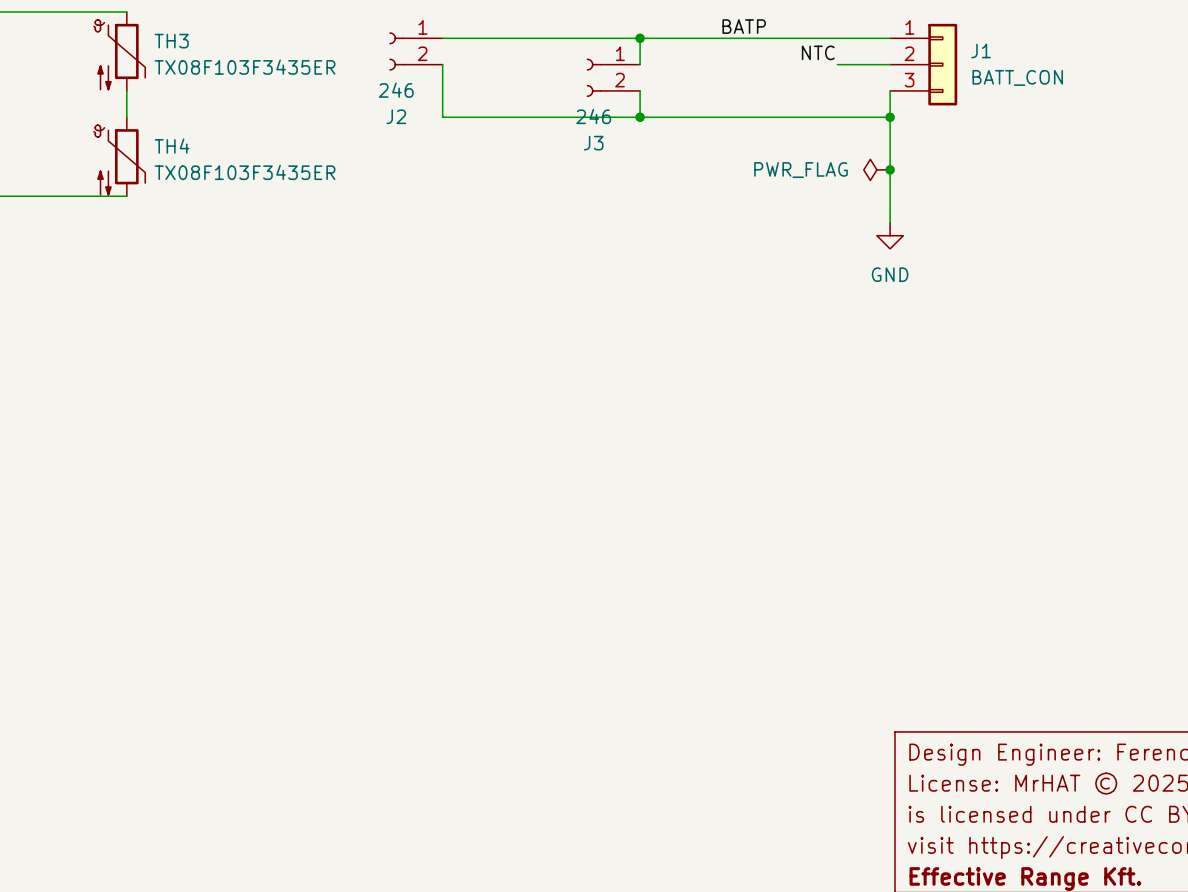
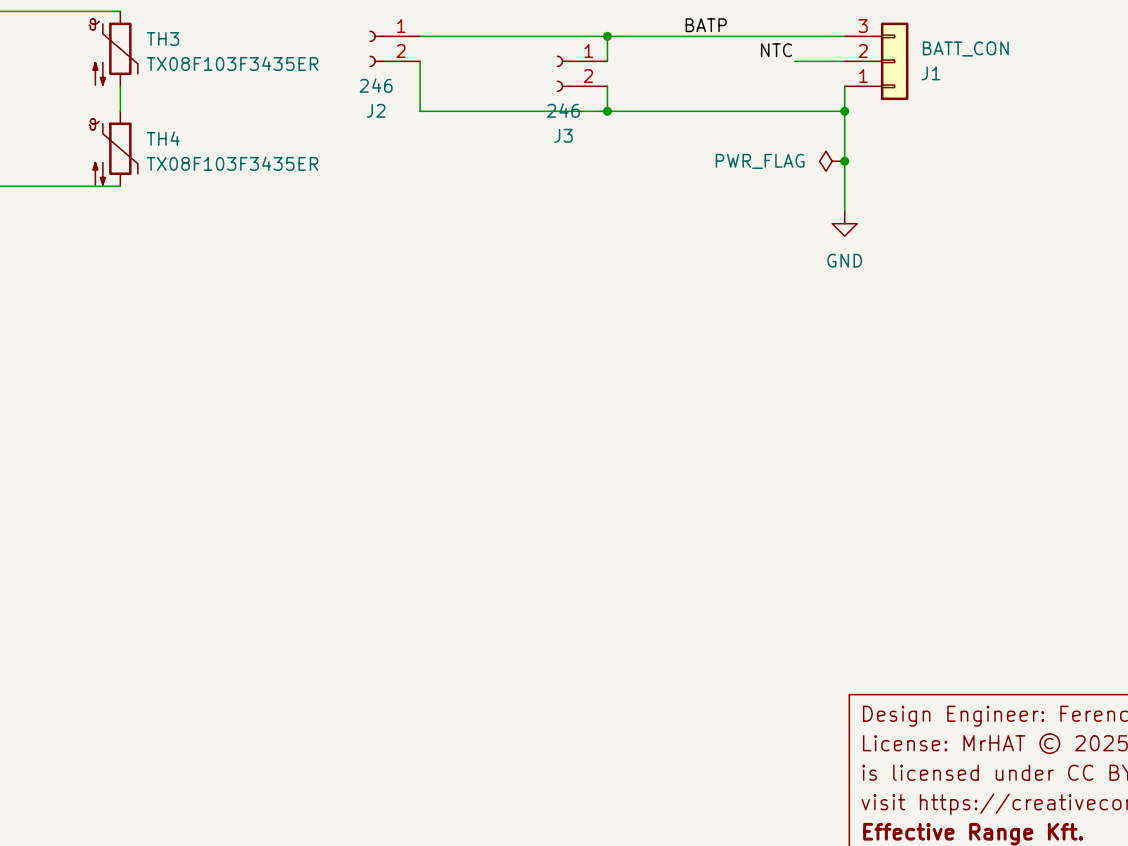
J1 flip: as is (942, 64) -> up-down (894, 61)

